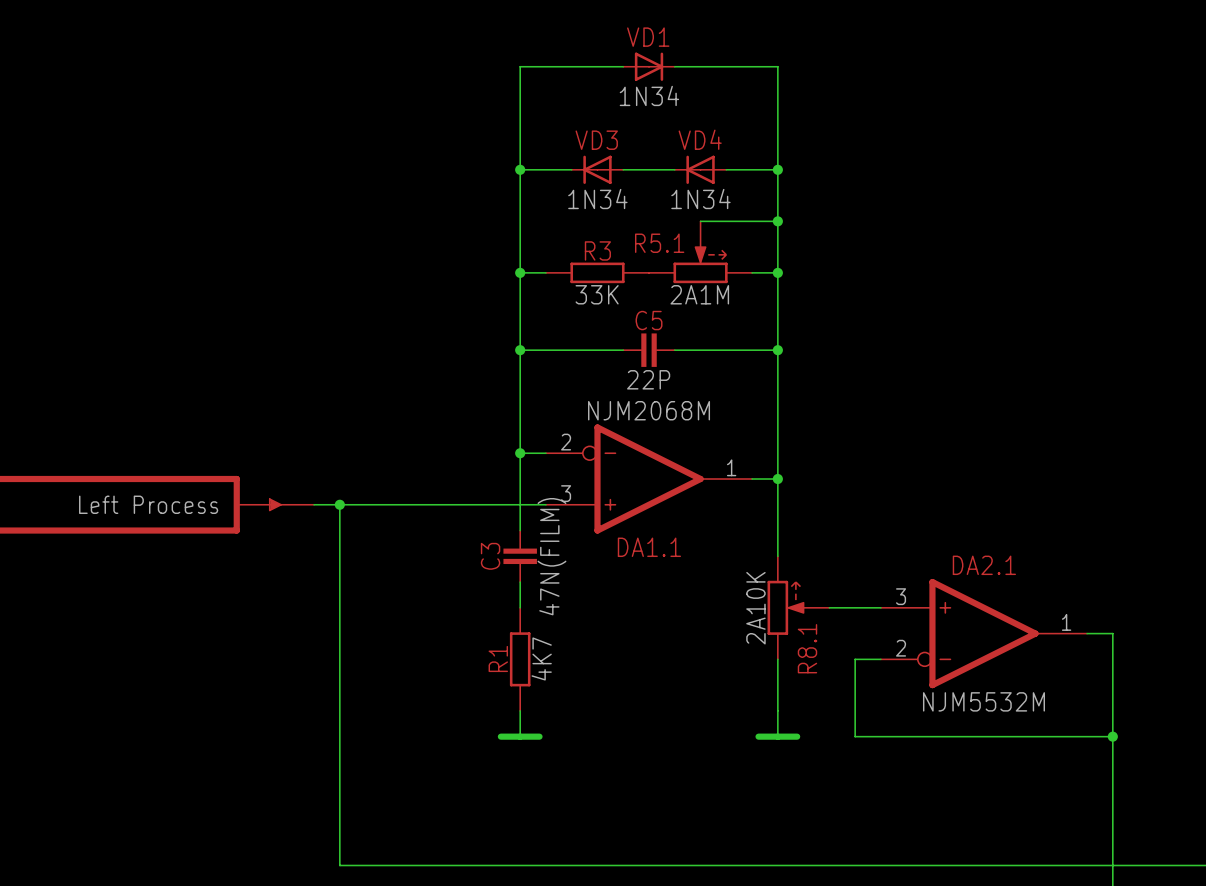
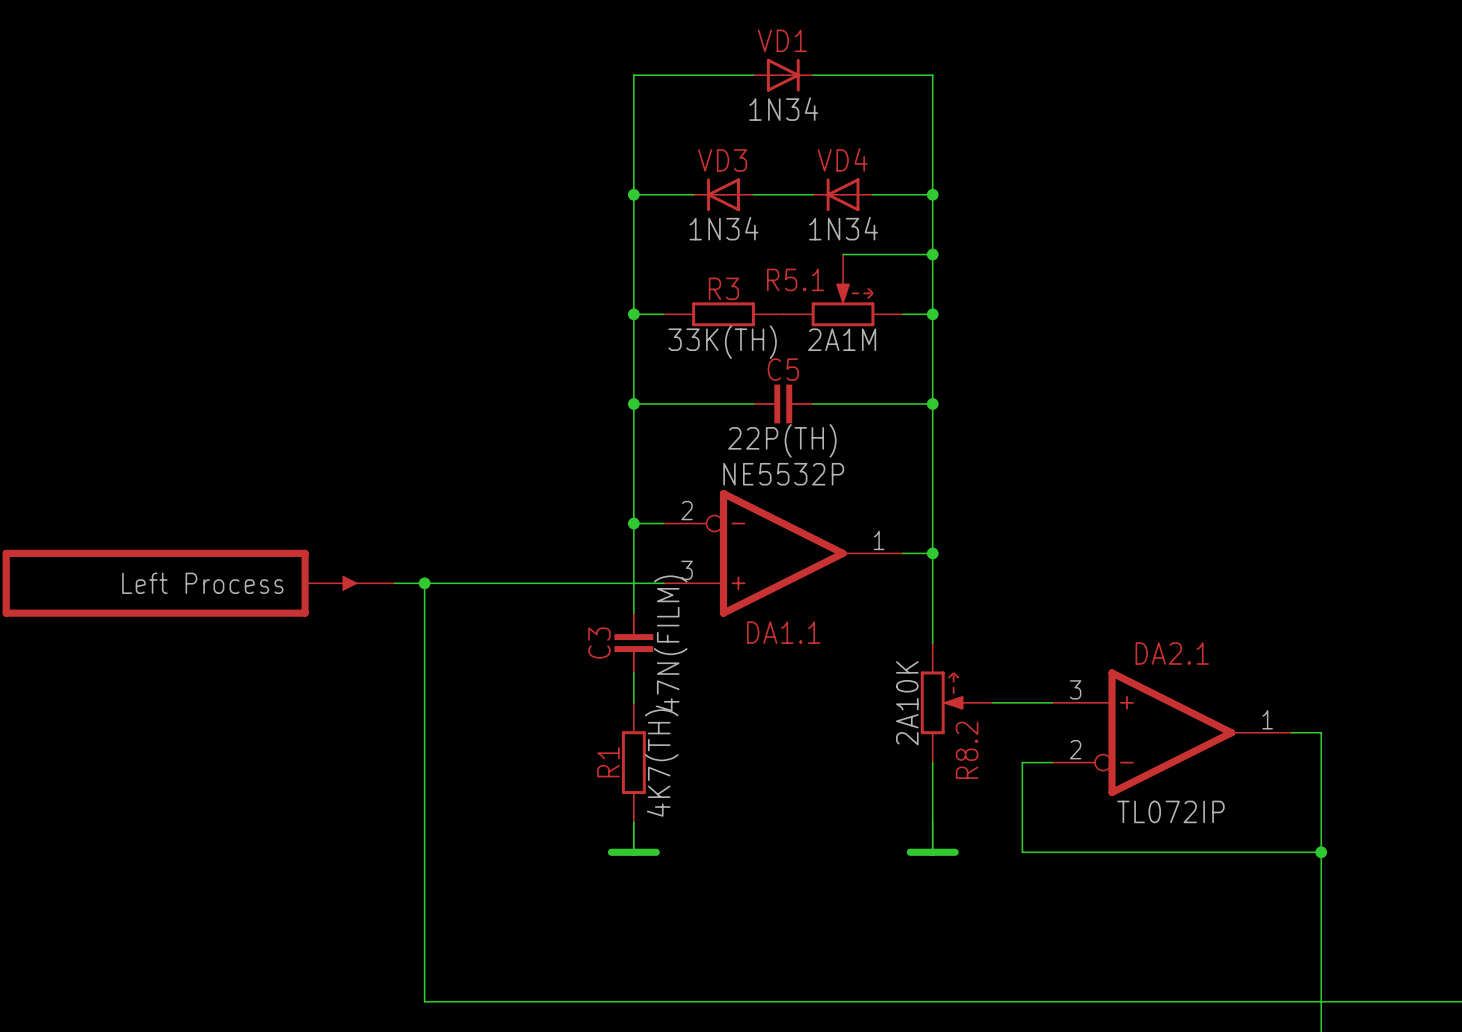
R3 value: 33K (597, 294) -> 33K(TH) (722, 342)
C5 value: 22P (648, 379) -> 22P(TH) (782, 440)
DA1.1 value: NJM2068M (649, 410) -> NE5532P (783, 474)
R8.1 name: R8.1 (807, 648) -> R8.2 (967, 750)
R1 value: 4K7 (541, 658) -> 4K7(TH) (661, 763)
DA2.1 value: NJM5532M (983, 701) -> TL072IP (1170, 811)

